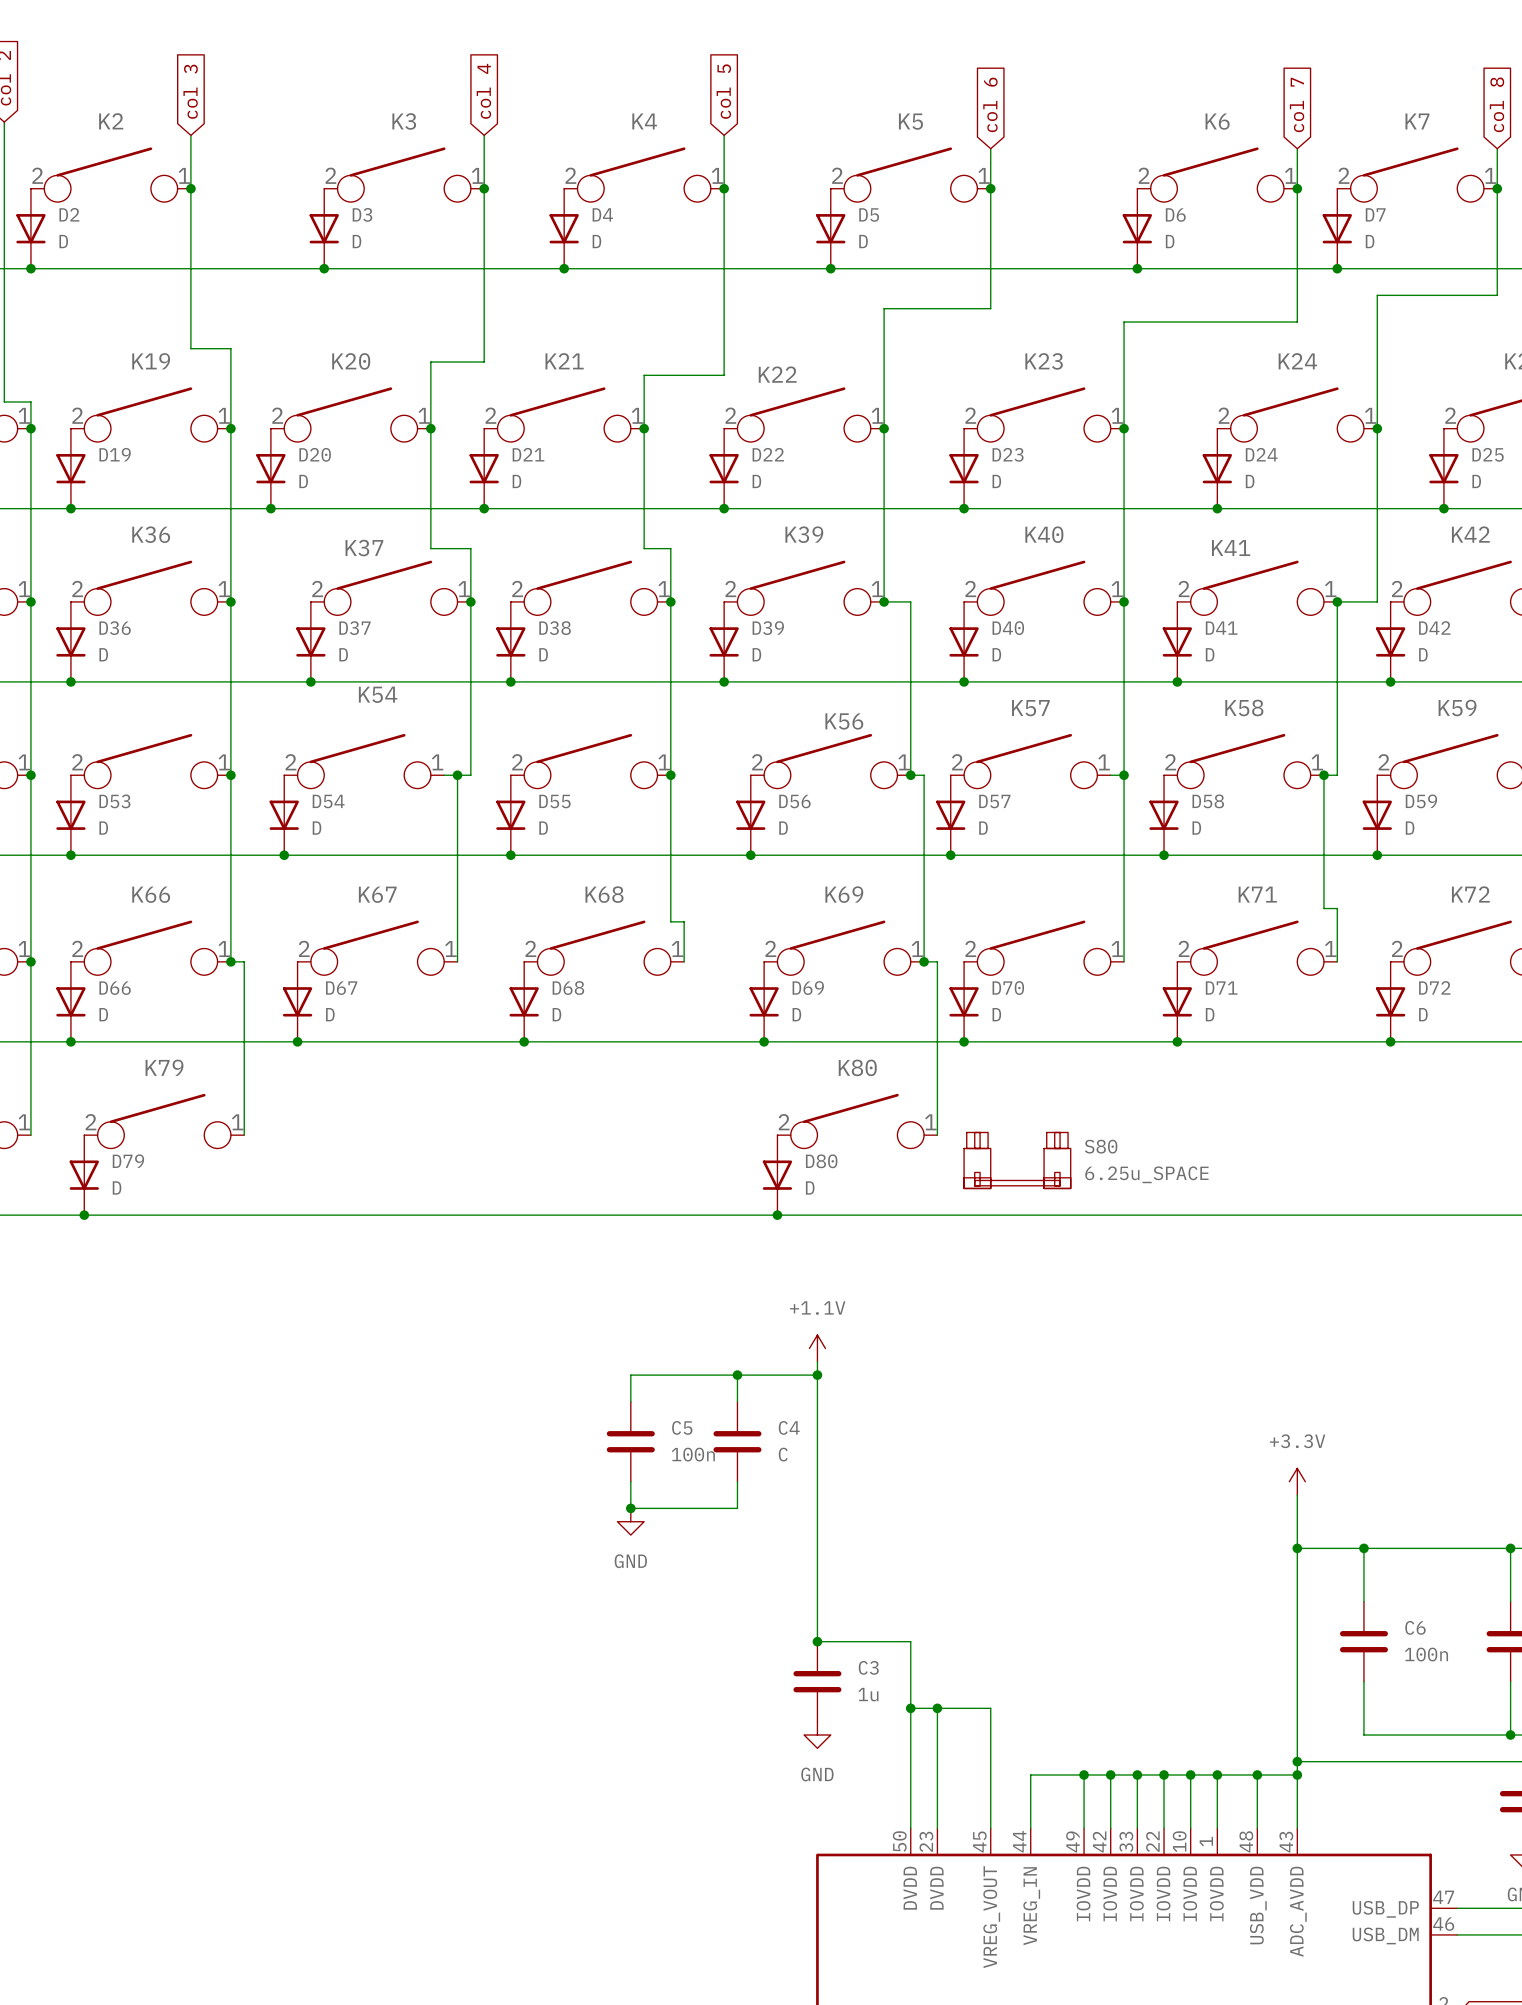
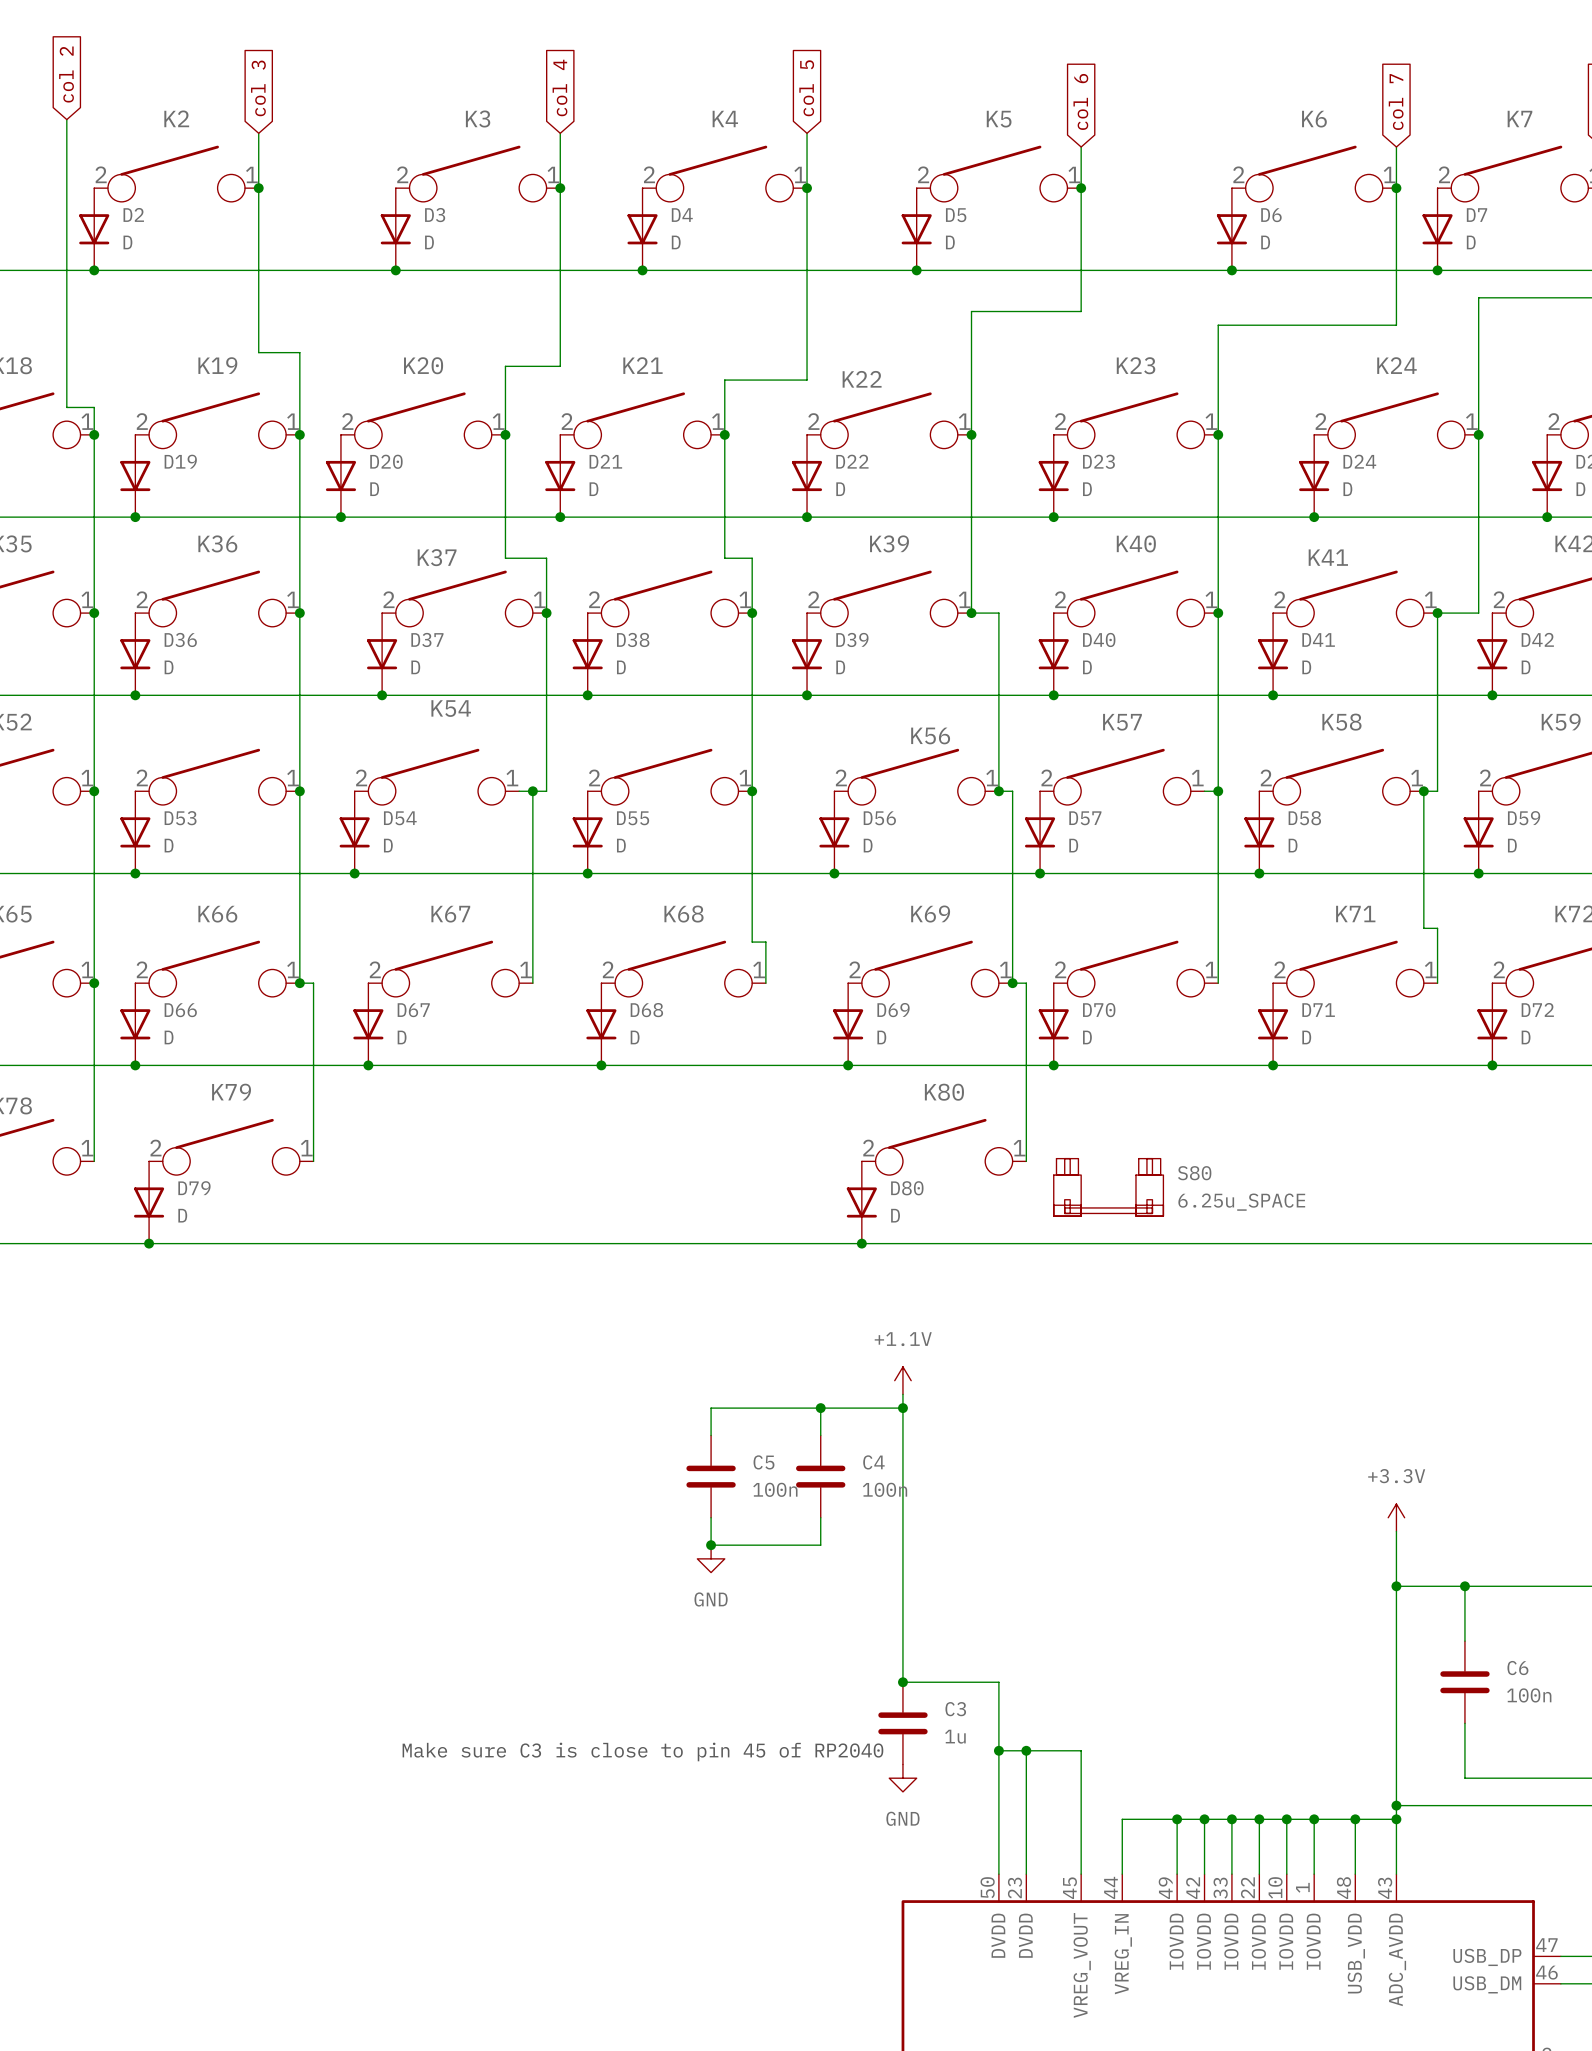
C4 value: C (783, 1454) -> 100n (885, 1489)
text: none -> Make sure C3 is close to pin 45 of RP2040 (642, 1751)

